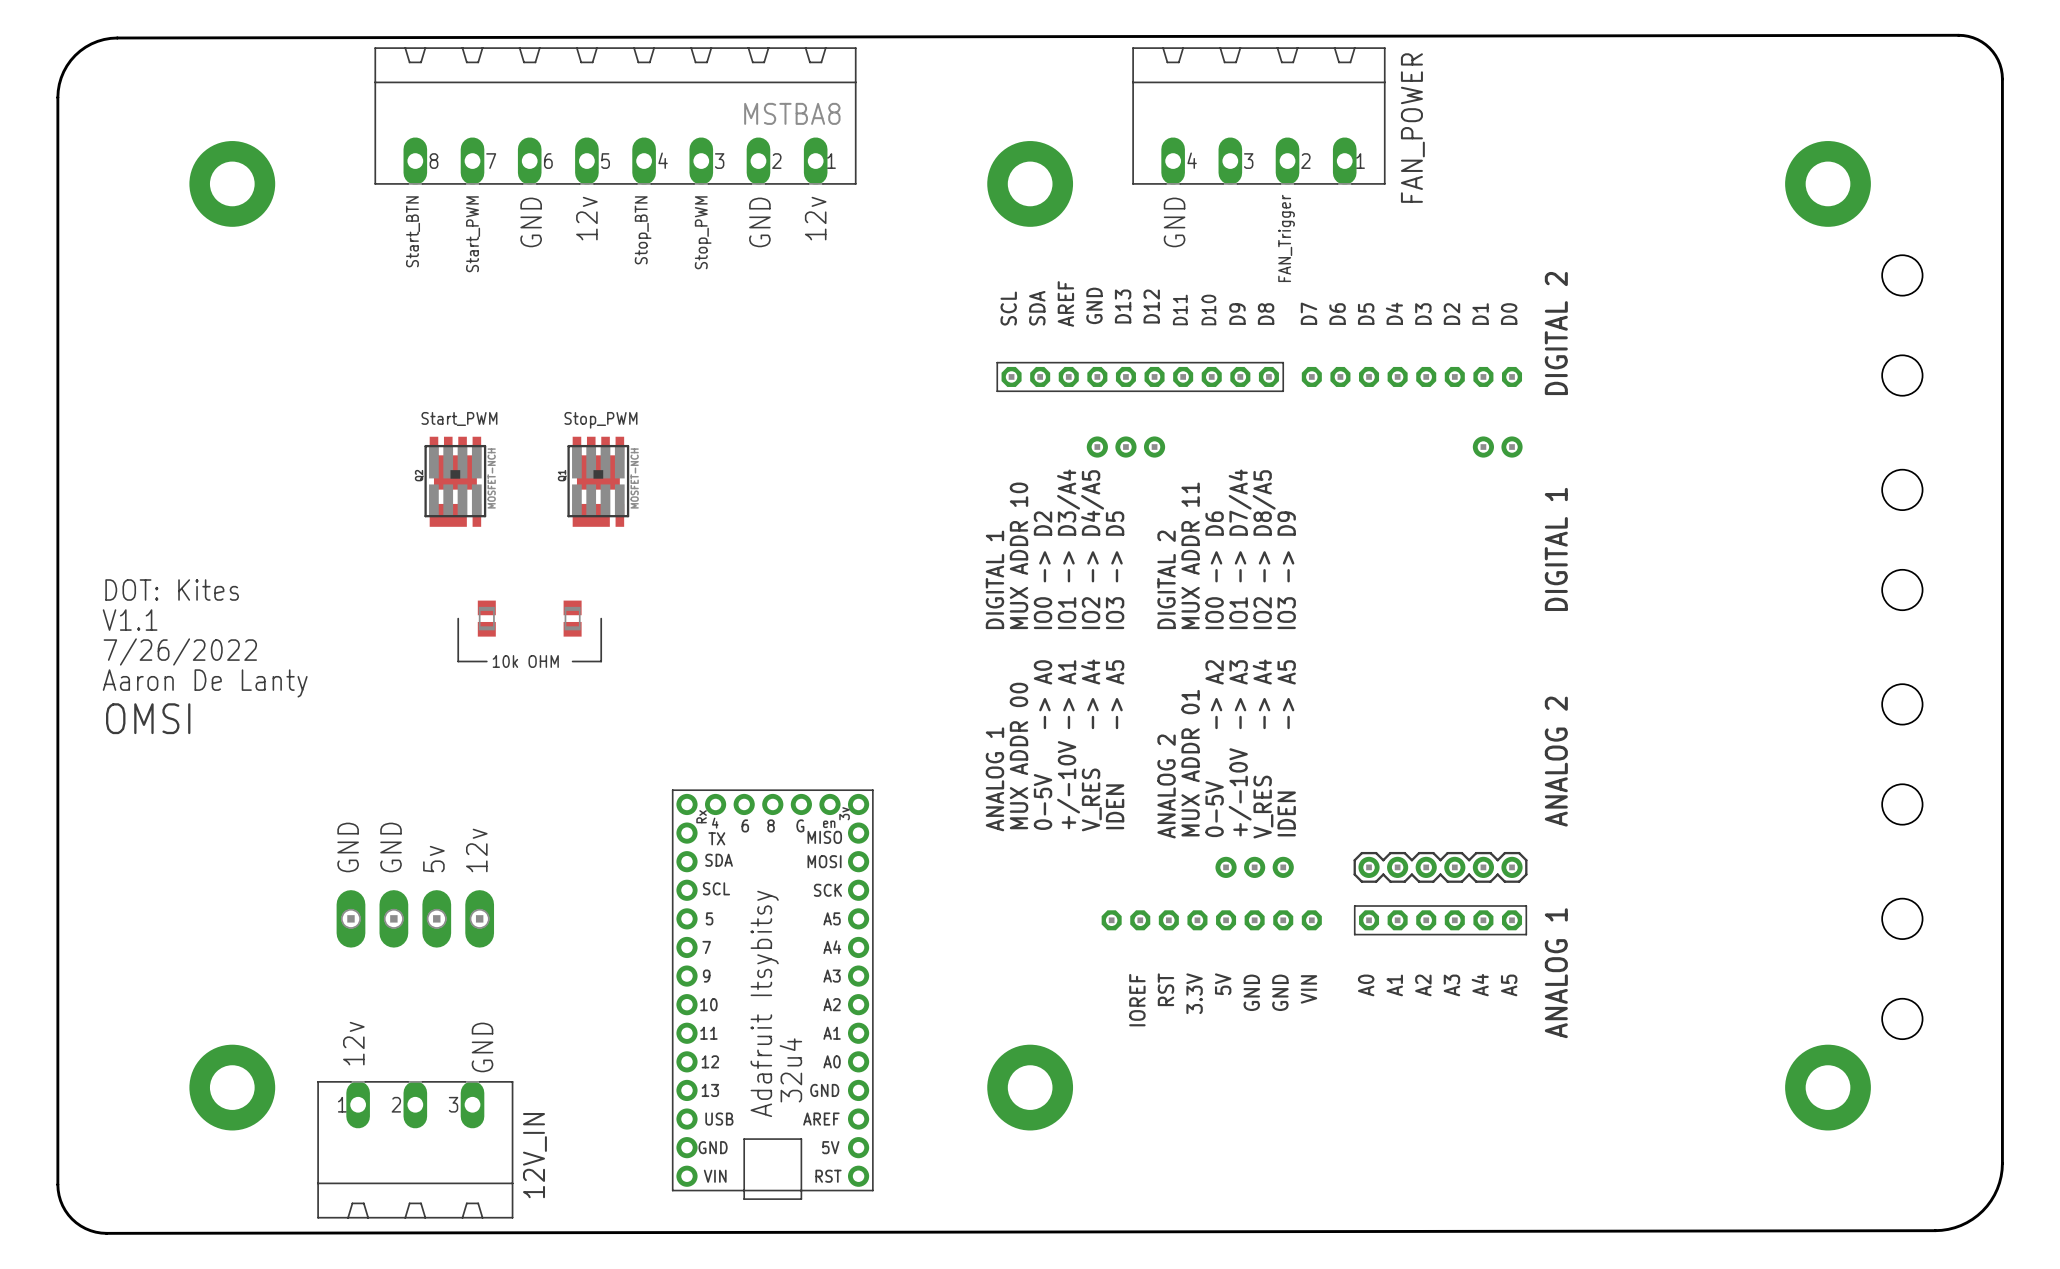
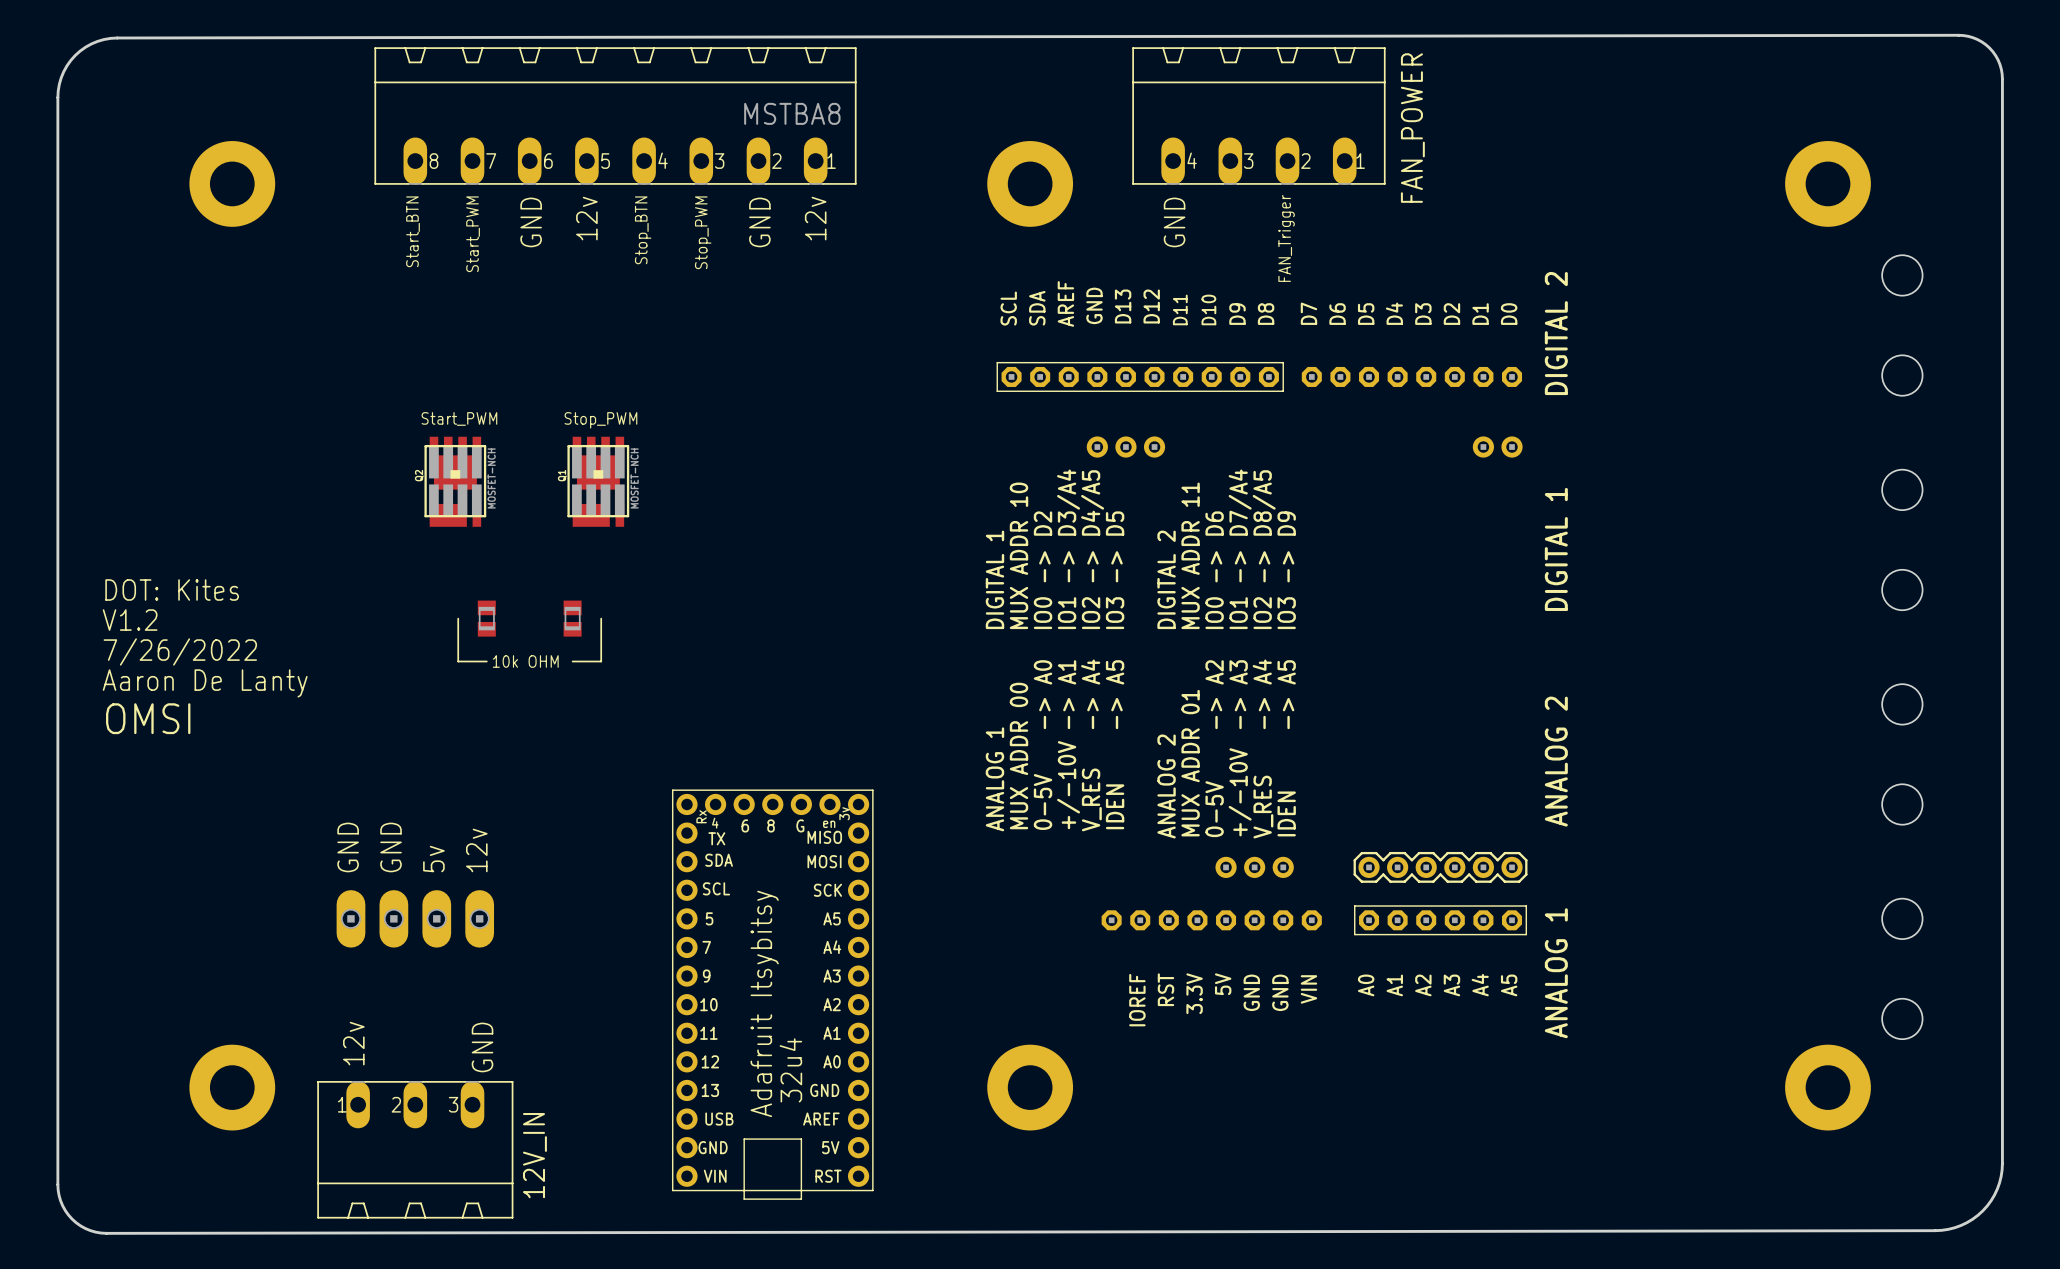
text: V1.1 (130, 620) -> V1.2 (130, 620)

